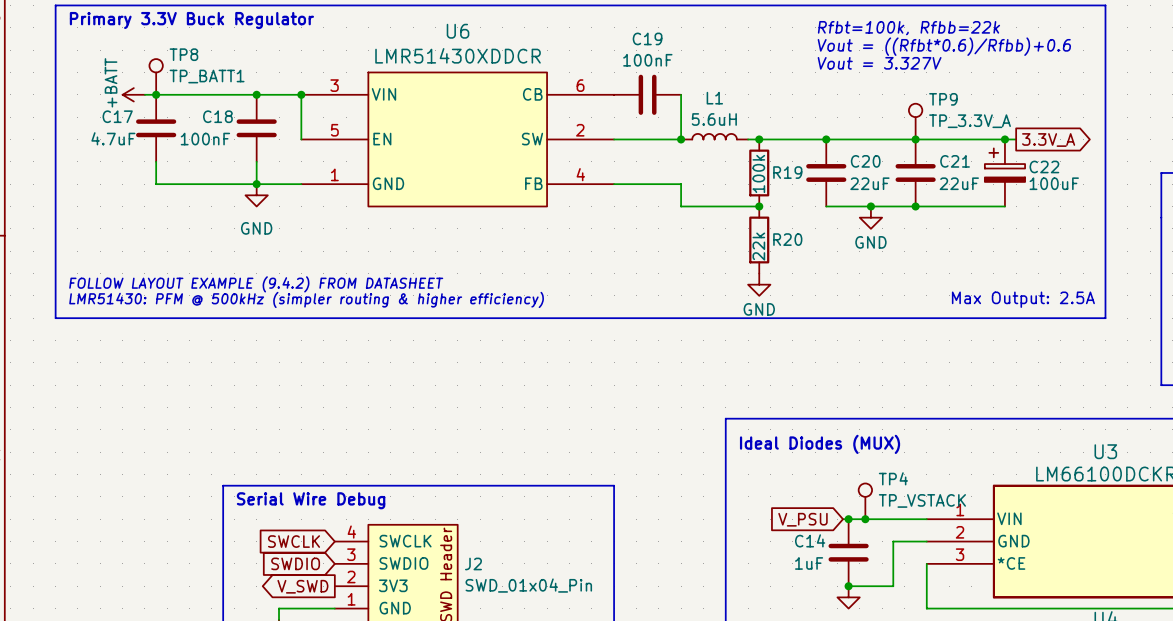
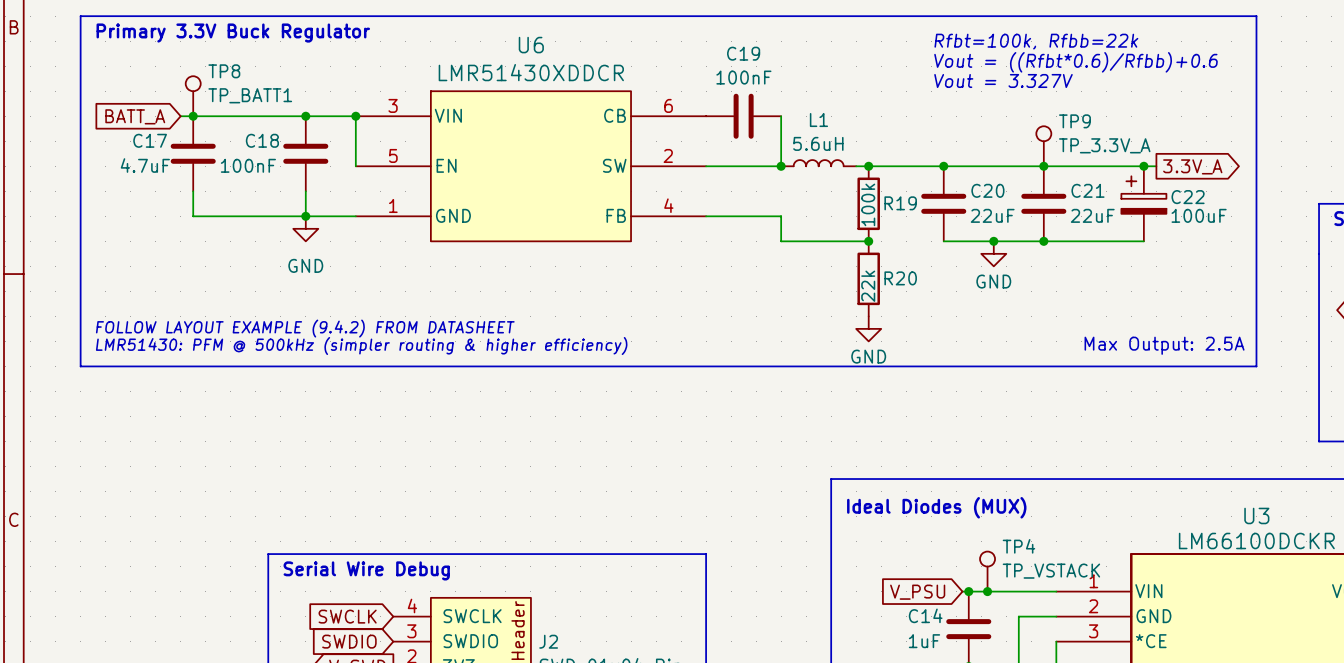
power symbol: +BATT (133, 94) -> none
global label: none -> BATT_A (135, 116)

